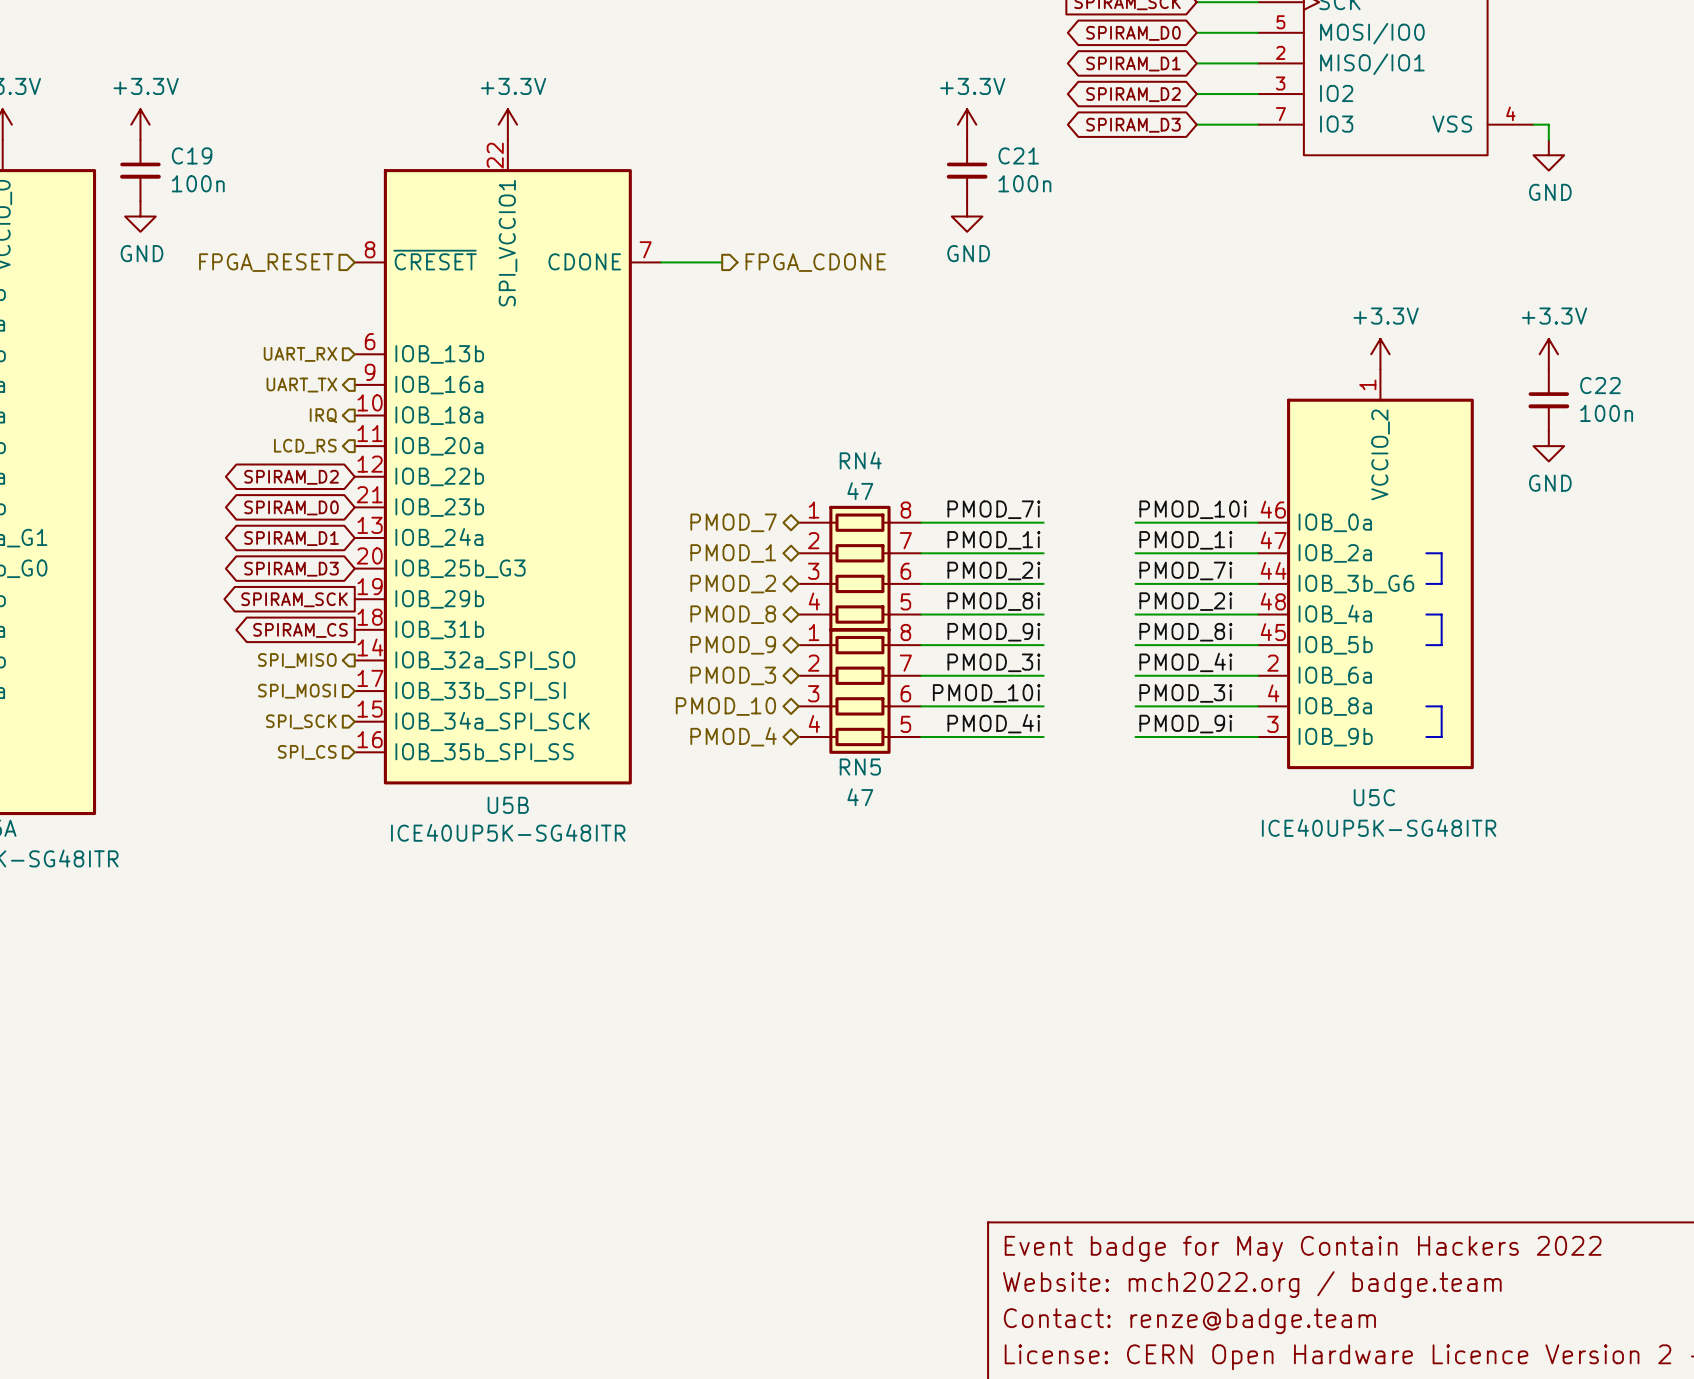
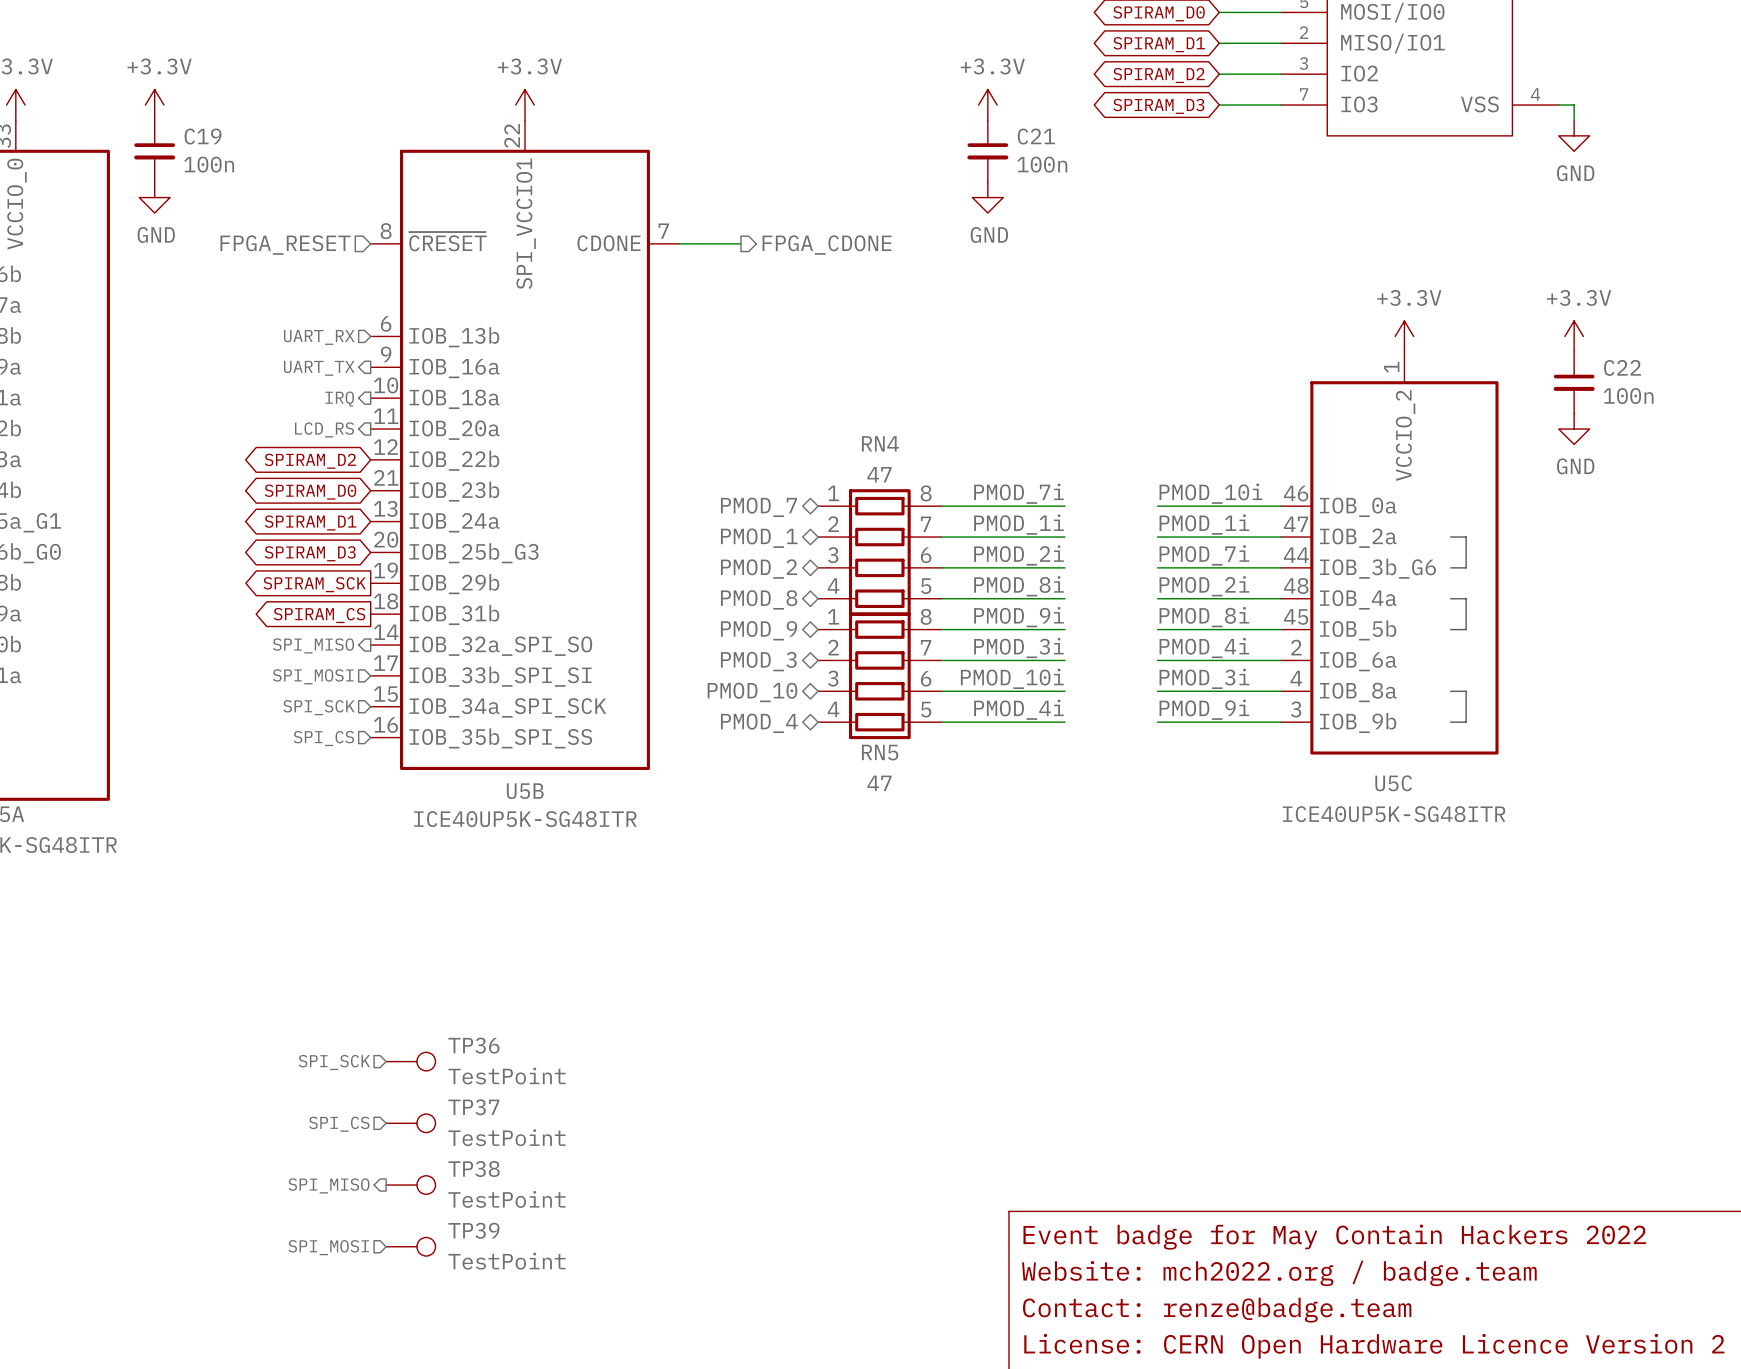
hierarchical label: none -> SPI_SCK (334, 1062)
TP36: none -> TestPoint (410, 1061)
hierarchical label: none -> SPI_CS (339, 1124)
TP37: none -> TestPoint (410, 1123)
hierarchical label: none -> SPI_MISO (328, 1185)
TP38: none -> TestPoint (410, 1185)
hierarchical label: none -> SPI_MOSI (328, 1247)
TP39: none -> TestPoint (410, 1246)

